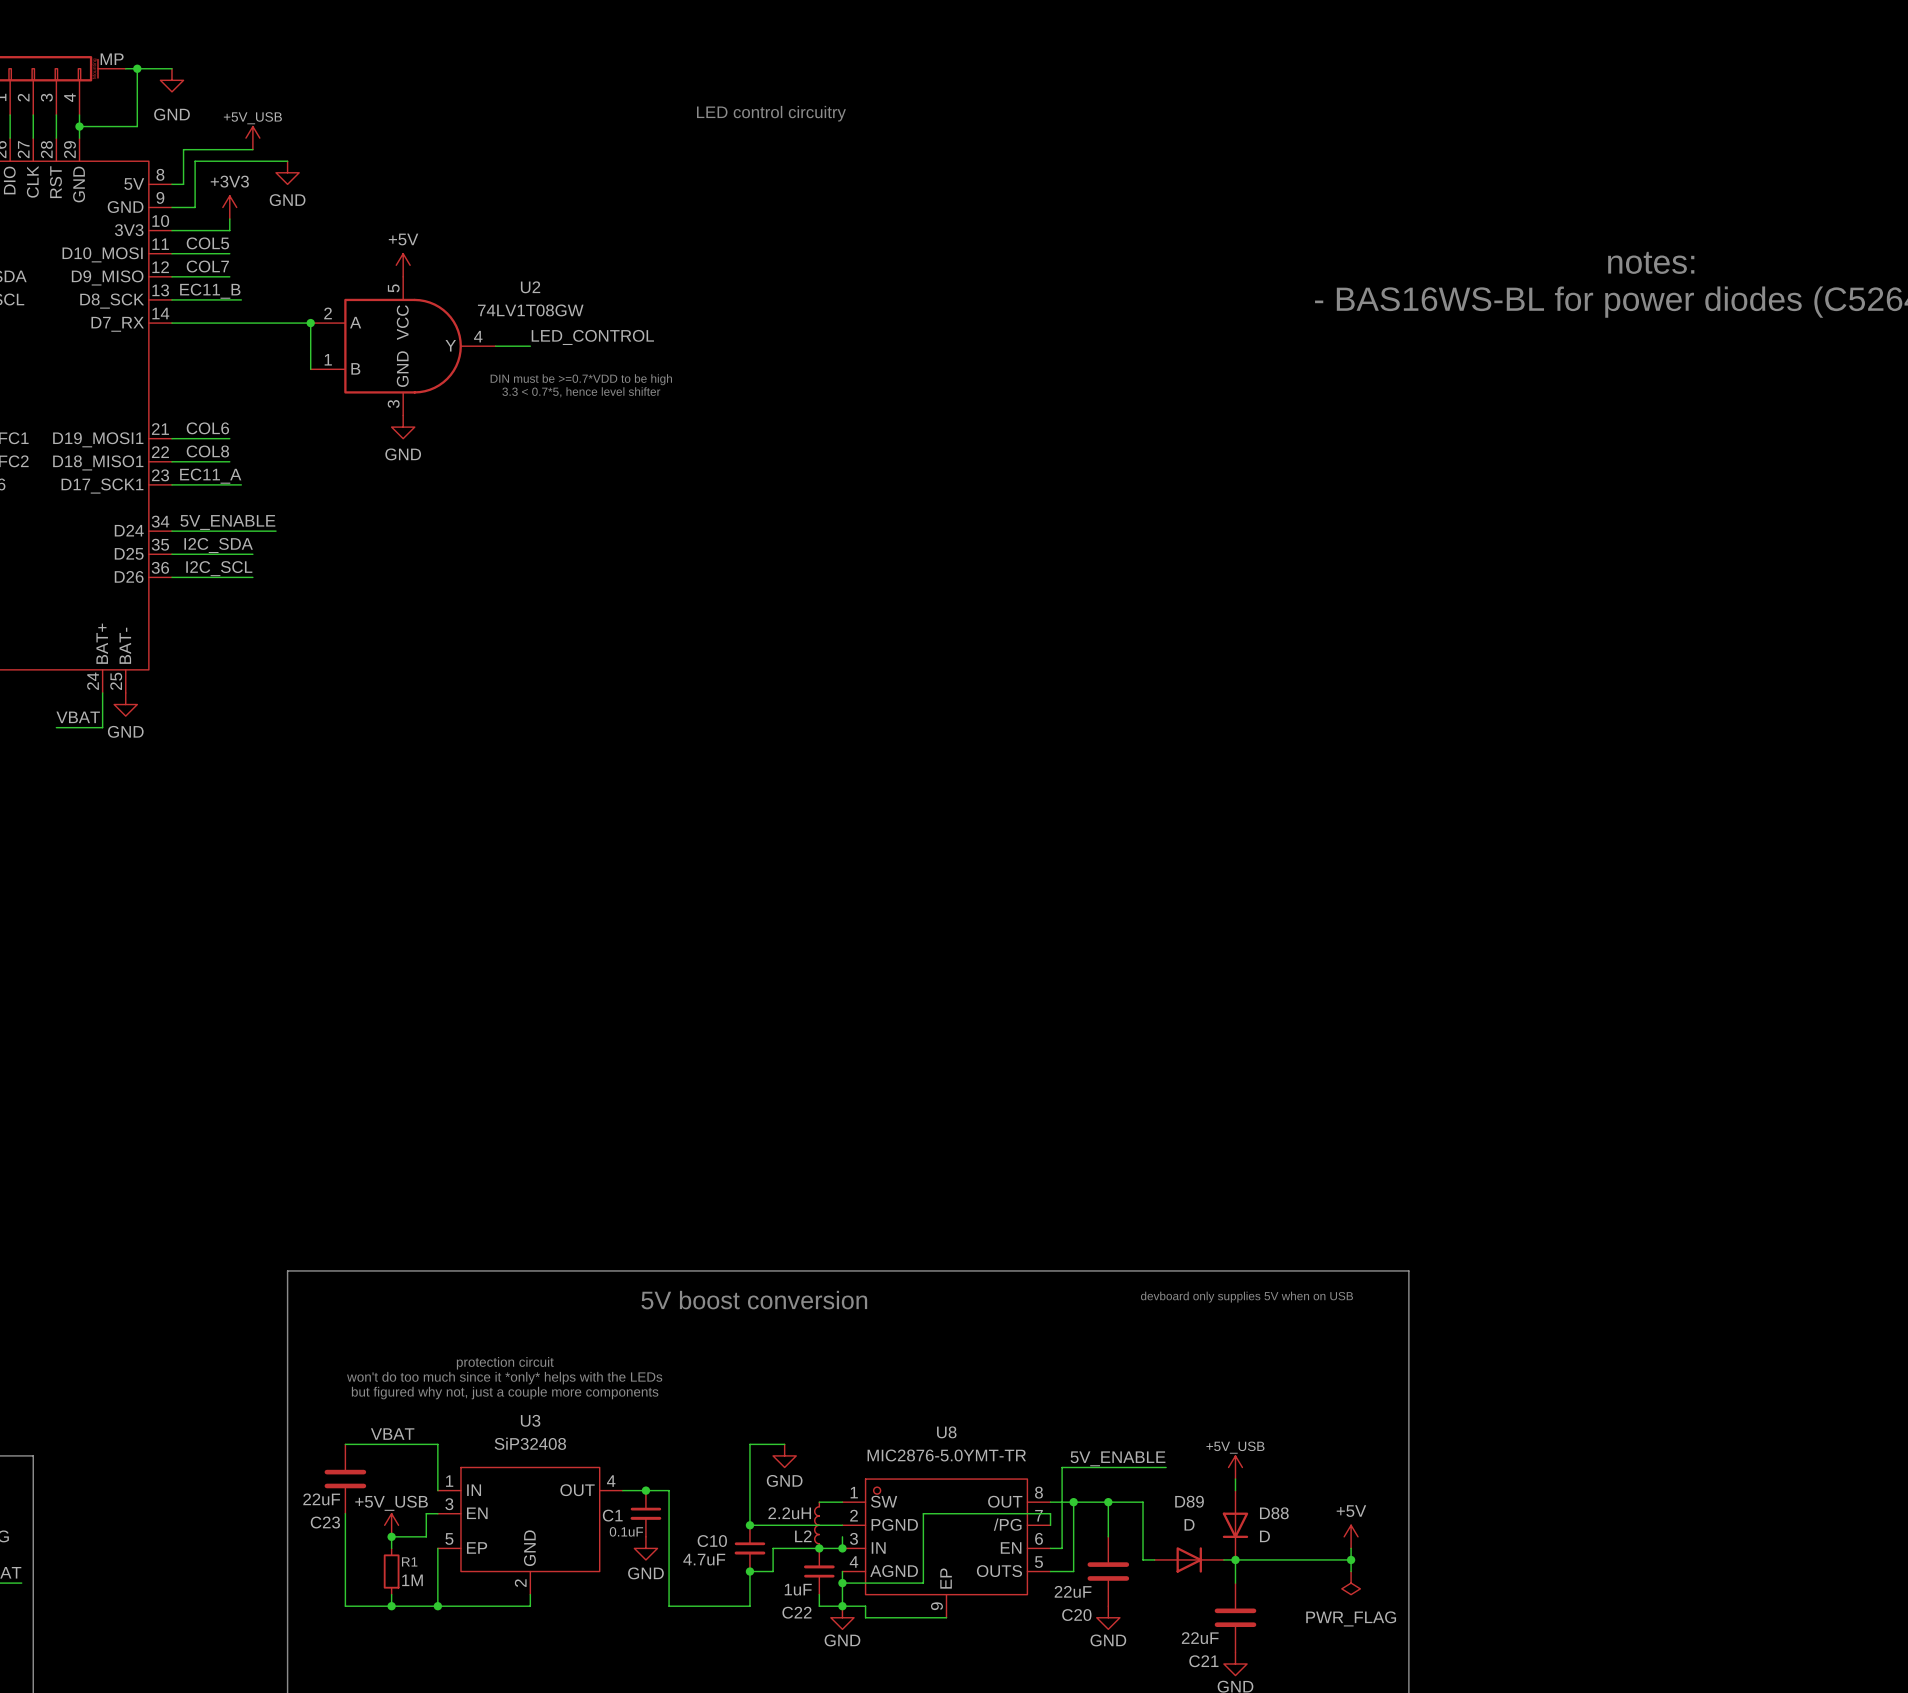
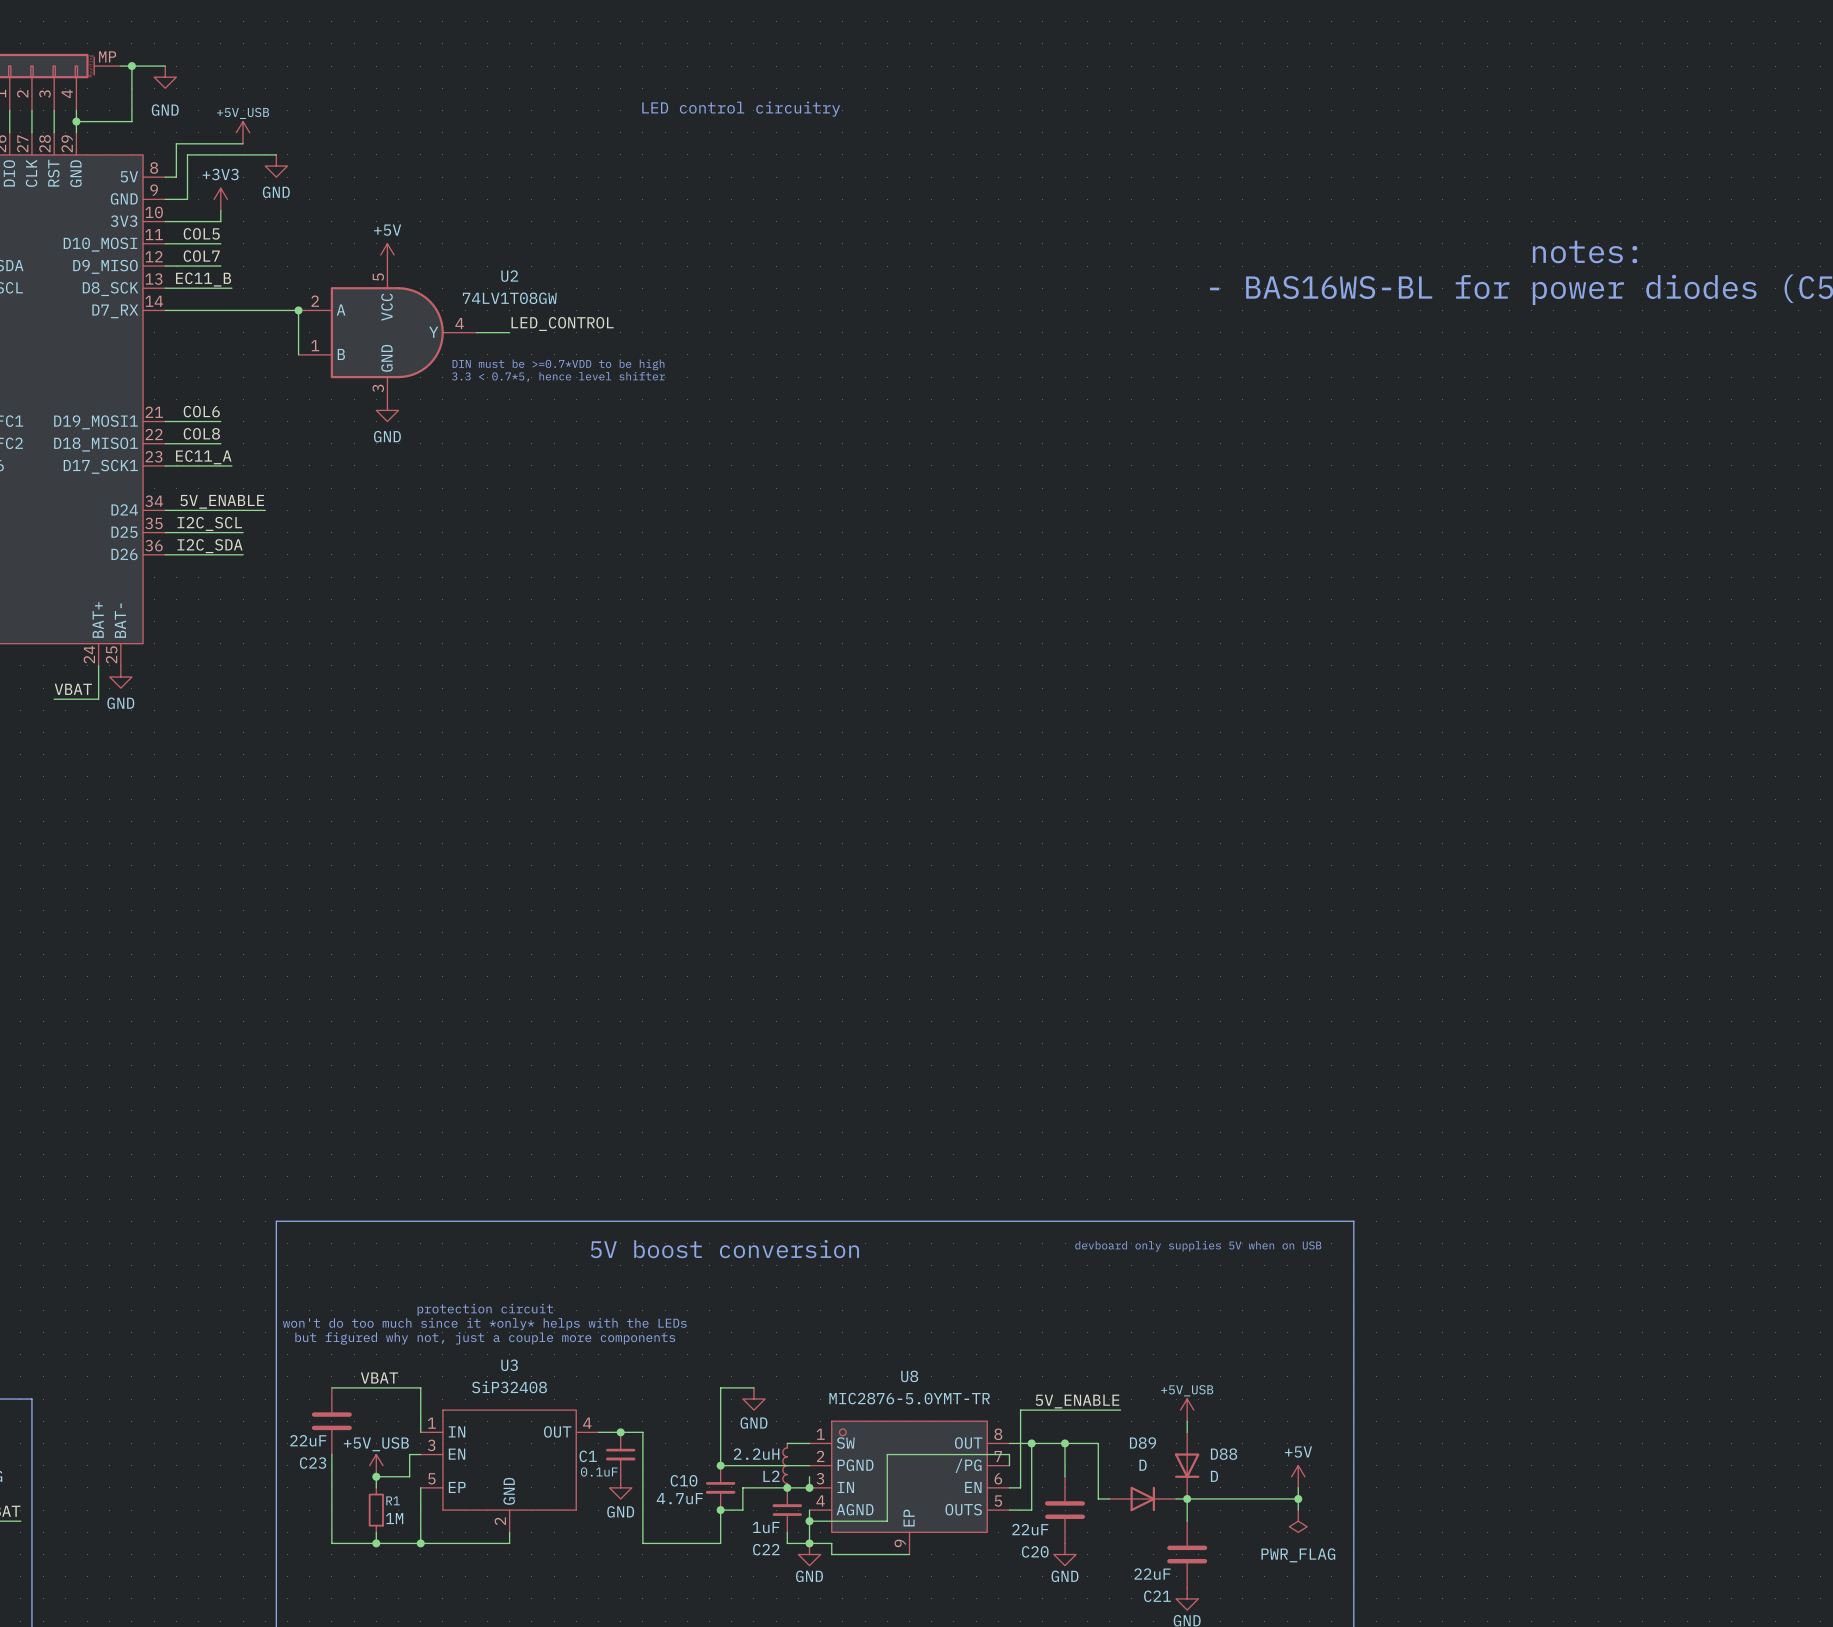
label: I2C_SDA (218, 545) -> I2C_SCL (209, 523)
label: I2C_SCL (219, 568) -> I2C_SDA (210, 546)

